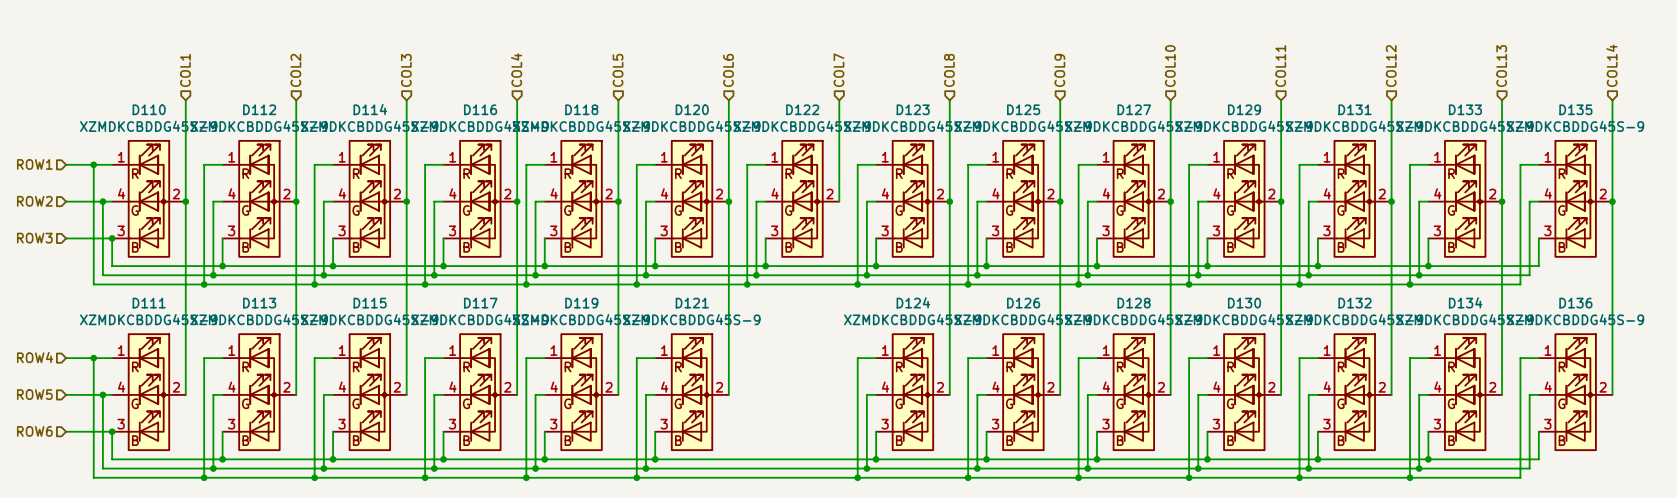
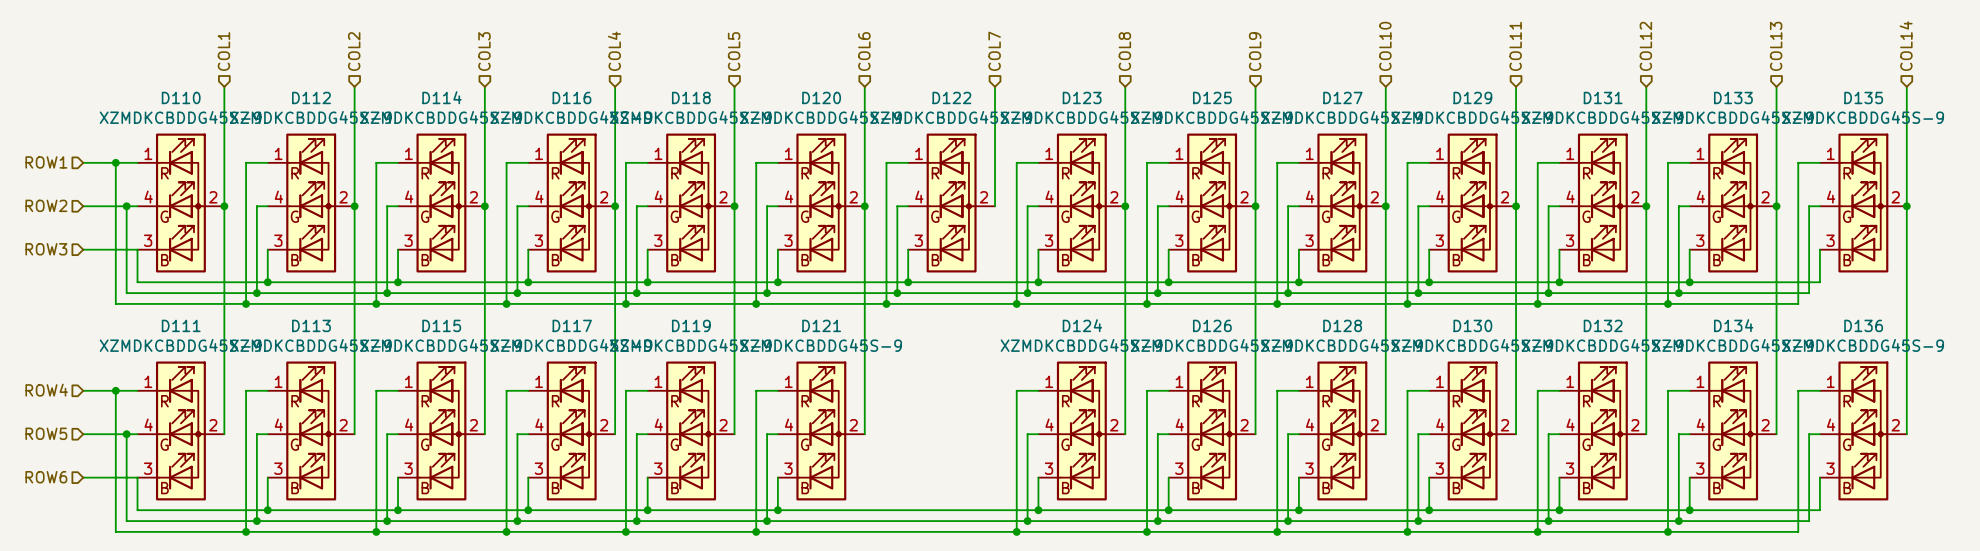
junction: (112, 238) -> none
junction: (112, 431) -> none

